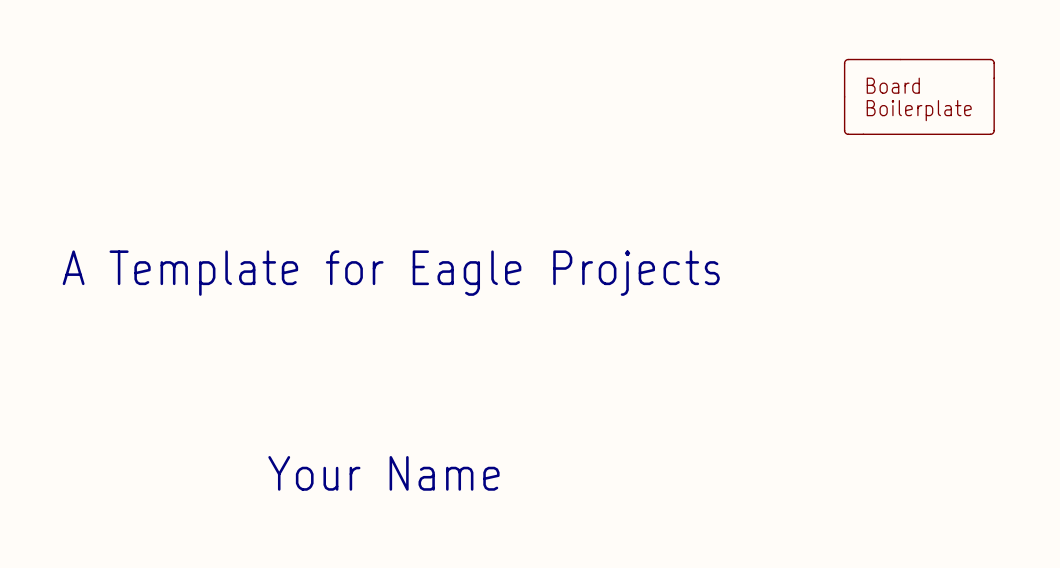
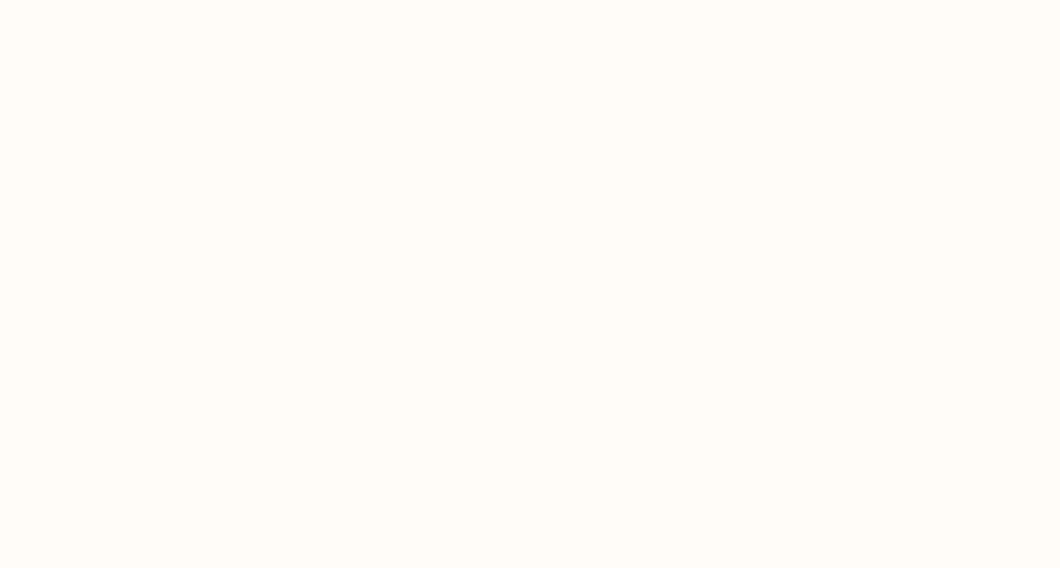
part: (919, 96) -> none
text: A Template for Eagle Projects (391, 273) -> none
text: Your Name (383, 473) -> none

